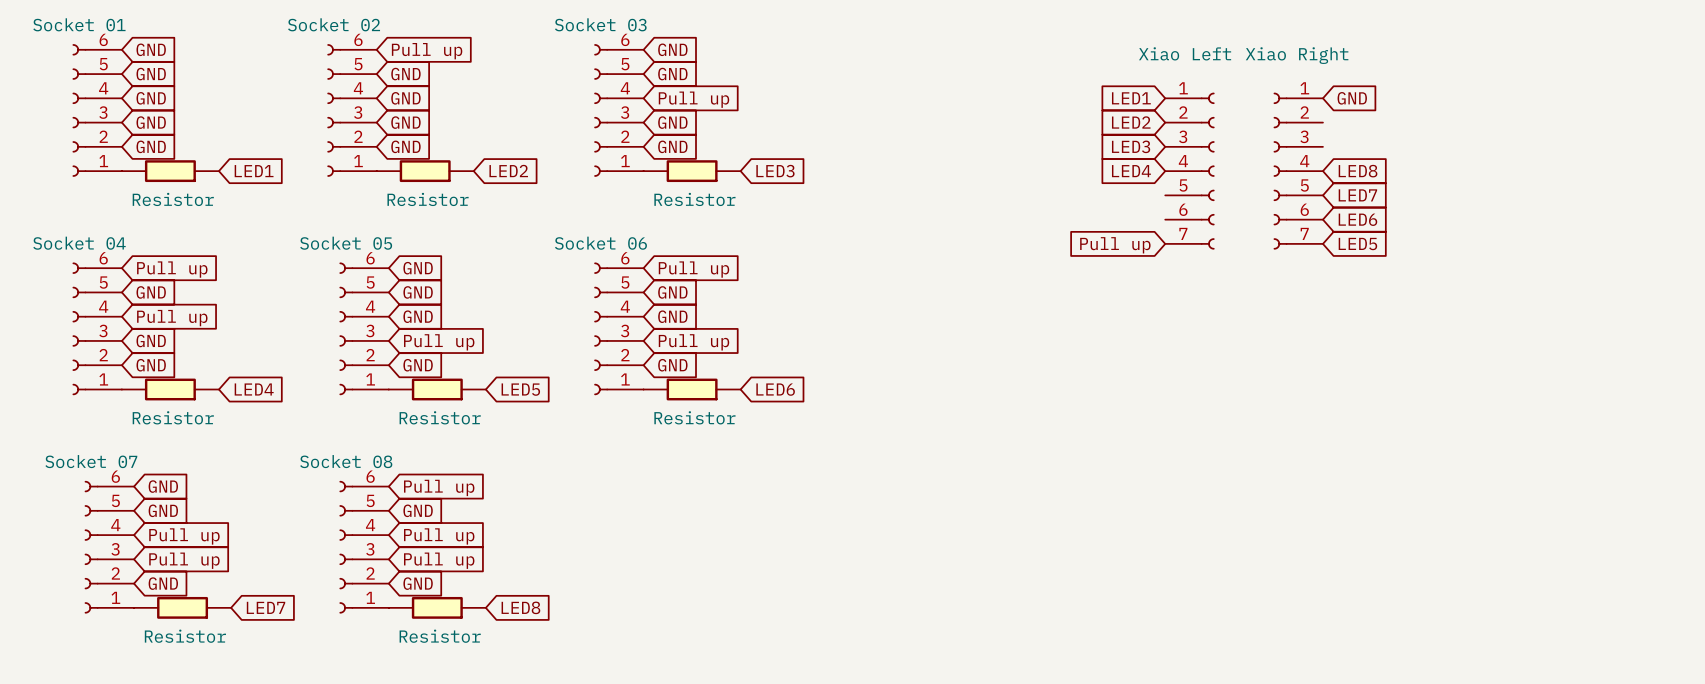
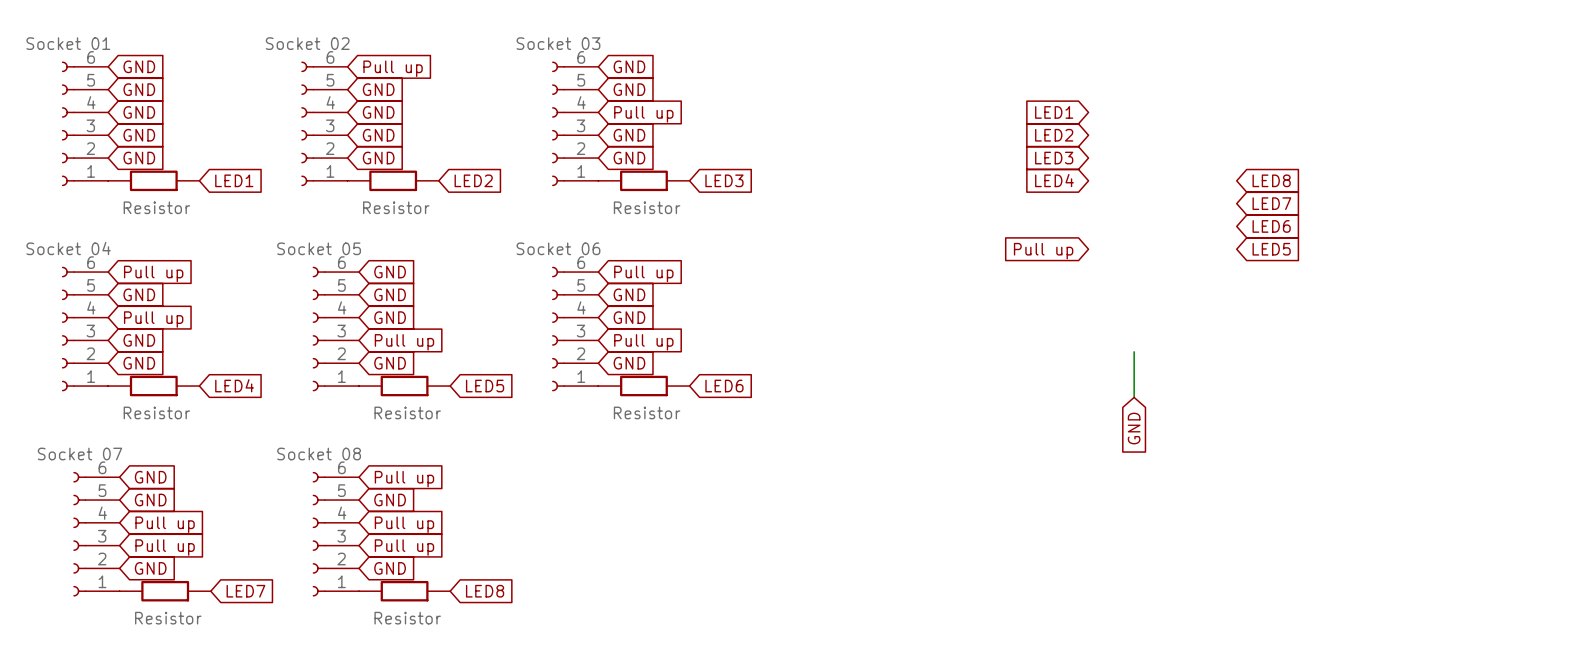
global label: GND (1352, 98) -> none
part: Xiao Left (1189, 171) -> none
part: Xiao Right (1298, 171) -> none
wire: none -> (1134, 351) (1134, 397)
global label: none -> GND (1134, 428)

